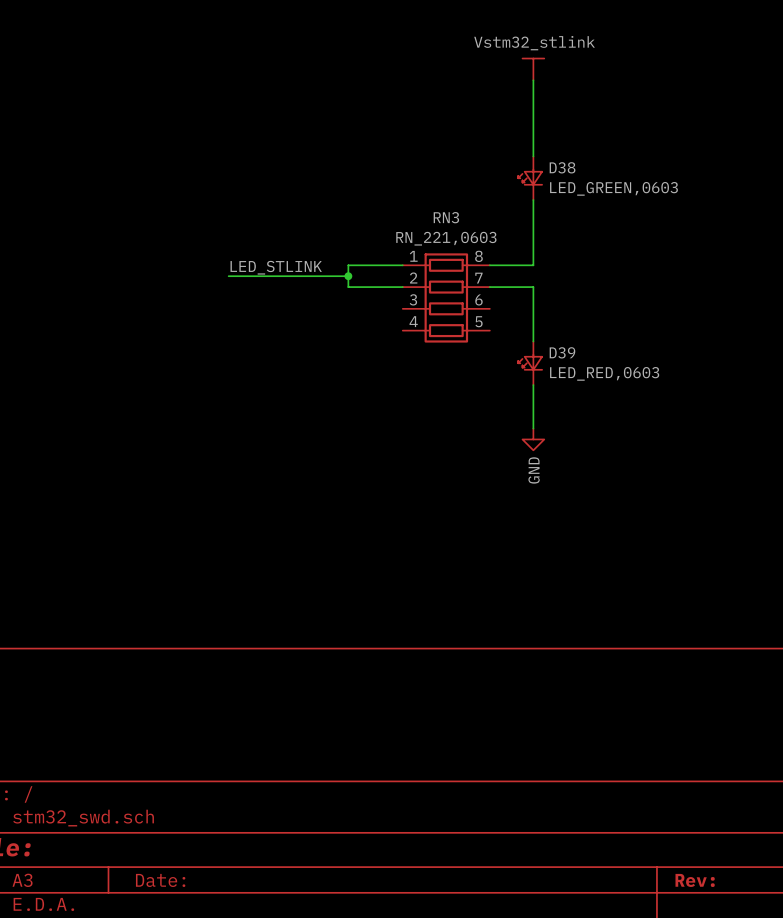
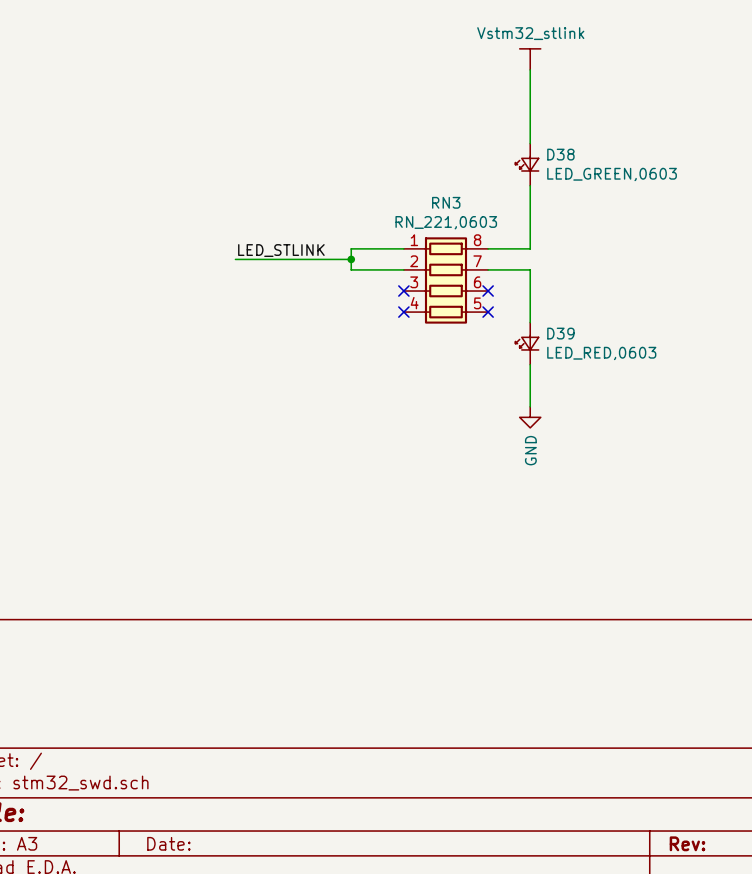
no-connect mark: none -> (403, 291)
no-connect mark: none -> (488, 291)
no-connect mark: none -> (403, 312)
no-connect mark: none -> (488, 312)

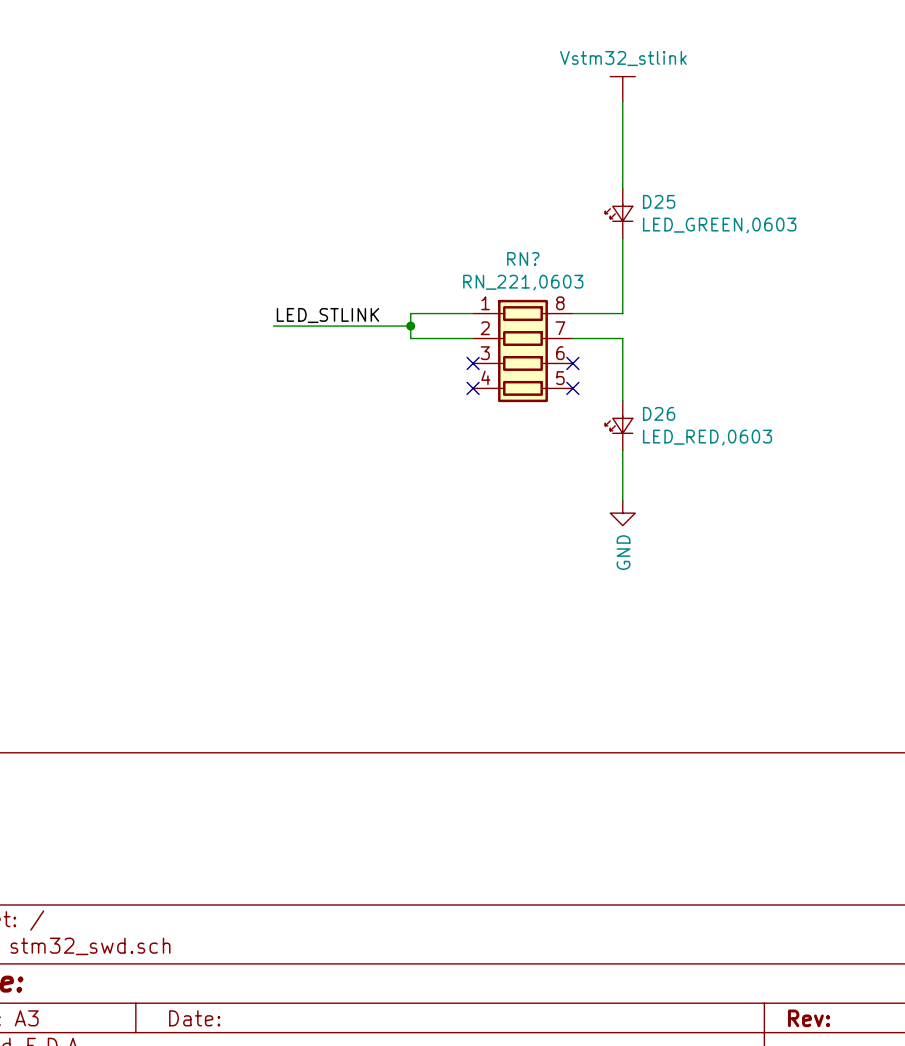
D38 name: D38 (560, 154) -> D25 (659, 201)
RN3 name: RN3 (446, 202) -> RN? (523, 258)
D39 name: D39 (560, 333) -> D26 (659, 413)

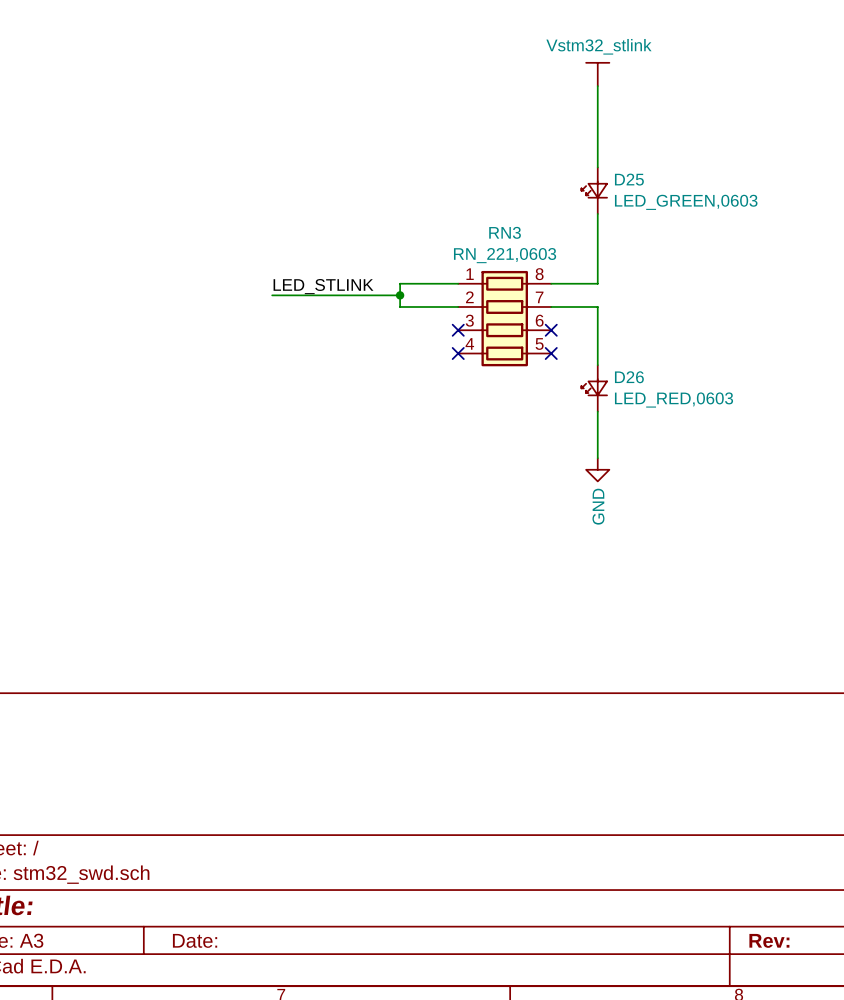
RN? name: RN? (523, 258) -> RN3 (505, 232)

